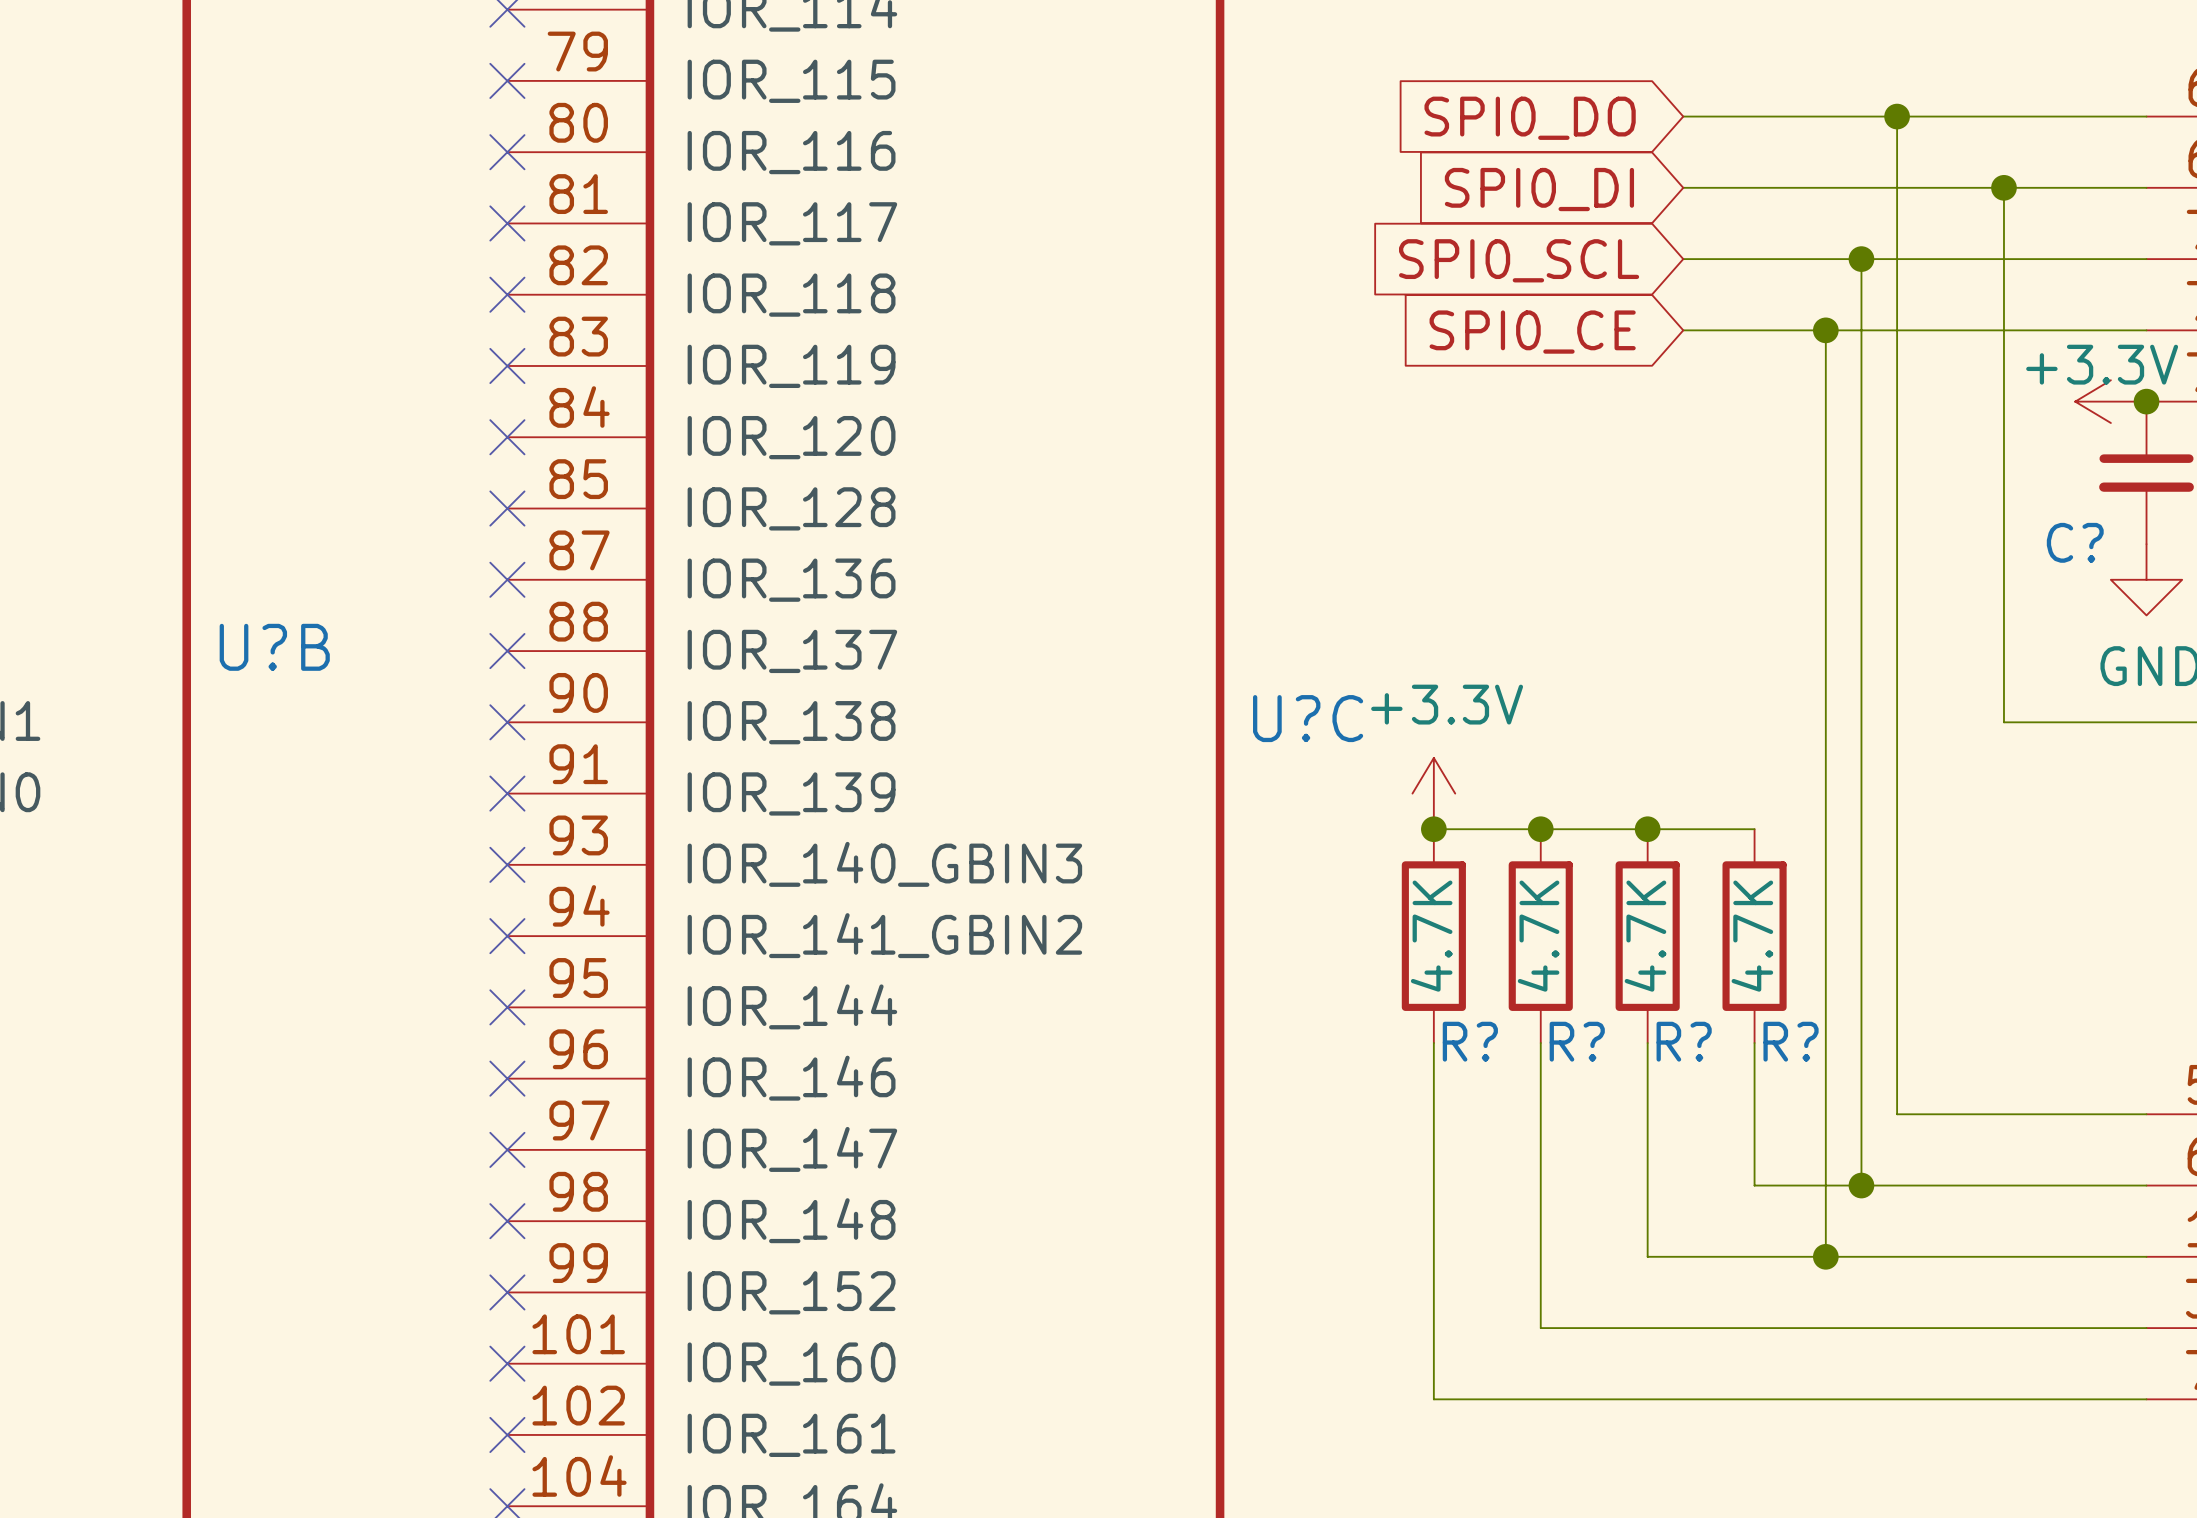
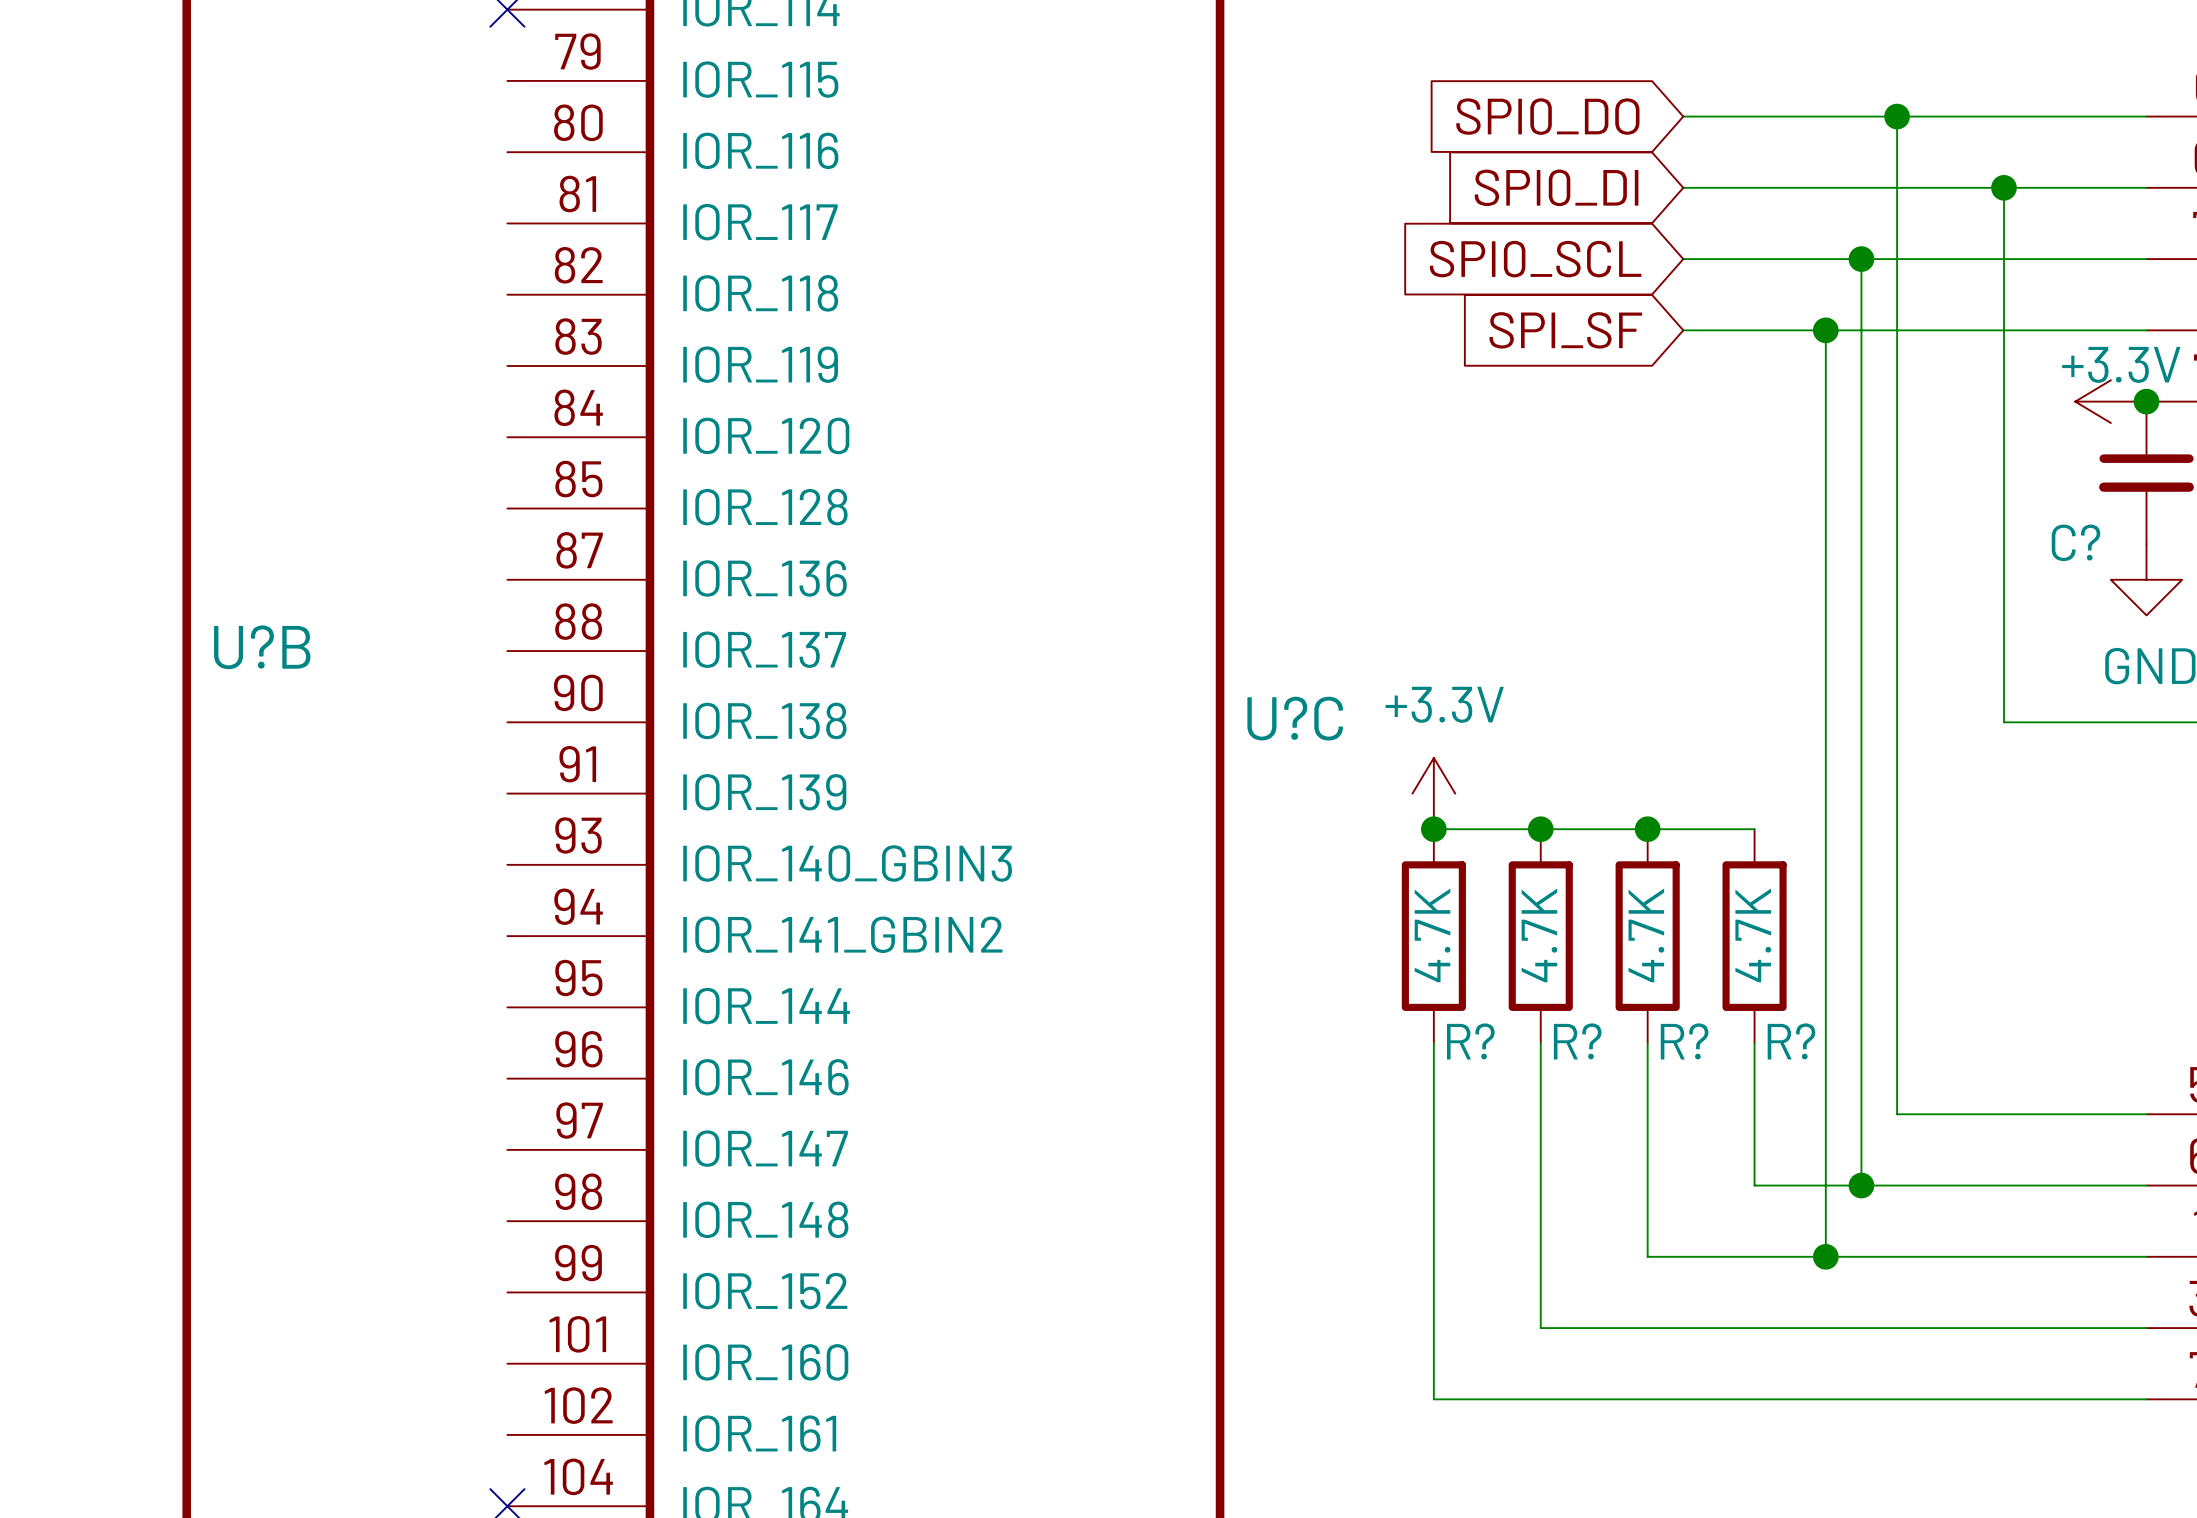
no-connect mark: (507, 80) -> none
no-connect mark: (507, 152) -> none
no-connect mark: (507, 223) -> none
no-connect mark: (507, 294) -> none
global label: SPI0_CE (1532, 332) -> SPI_SF (1565, 330)
no-connect mark: (507, 365) -> none
no-connect mark: (507, 437) -> none
no-connect mark: (507, 508) -> none
no-connect mark: (507, 579) -> none
no-connect mark: (507, 651) -> none
no-connect mark: (507, 722) -> none
no-connect mark: (507, 793) -> none
no-connect mark: (507, 864) -> none
no-connect mark: (507, 936) -> none
no-connect mark: (507, 1007) -> none
no-connect mark: (507, 1078) -> none
no-connect mark: (507, 1149) -> none
no-connect mark: (507, 1221) -> none
no-connect mark: (507, 1292) -> none
no-connect mark: (507, 1363) -> none
no-connect mark: (507, 1434) -> none

